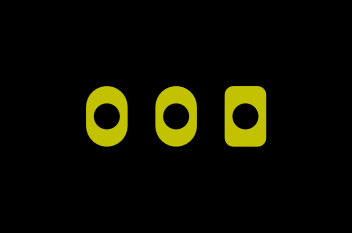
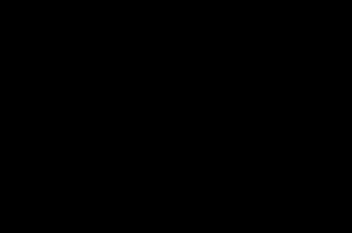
part: (176, 116) -> none

